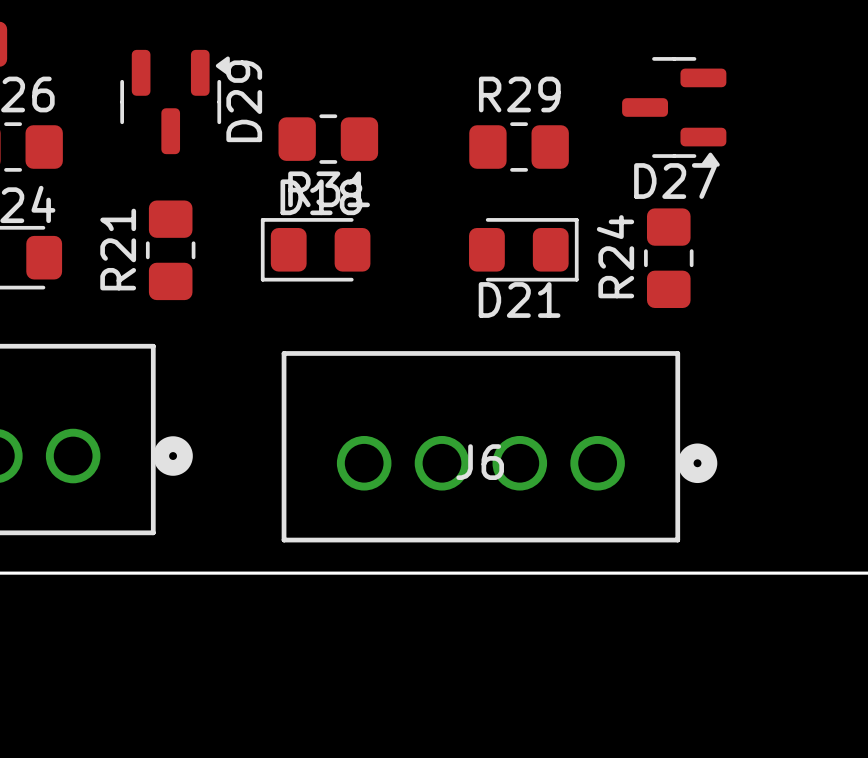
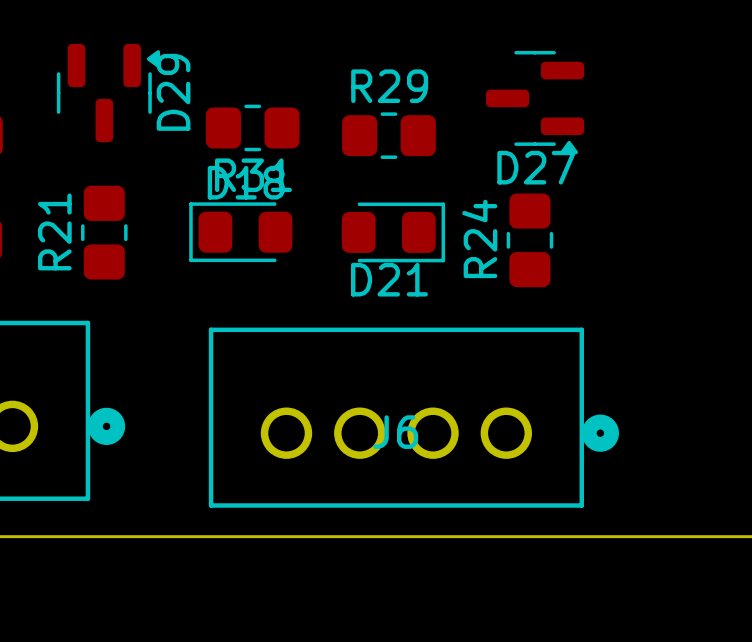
D27 position: (674, 111) -> (535, 102)
R29 position: (519, 147) -> (388, 135)
D21 position: (523, 249) -> (393, 232)
R24 position: (668, 258) -> (529, 240)

